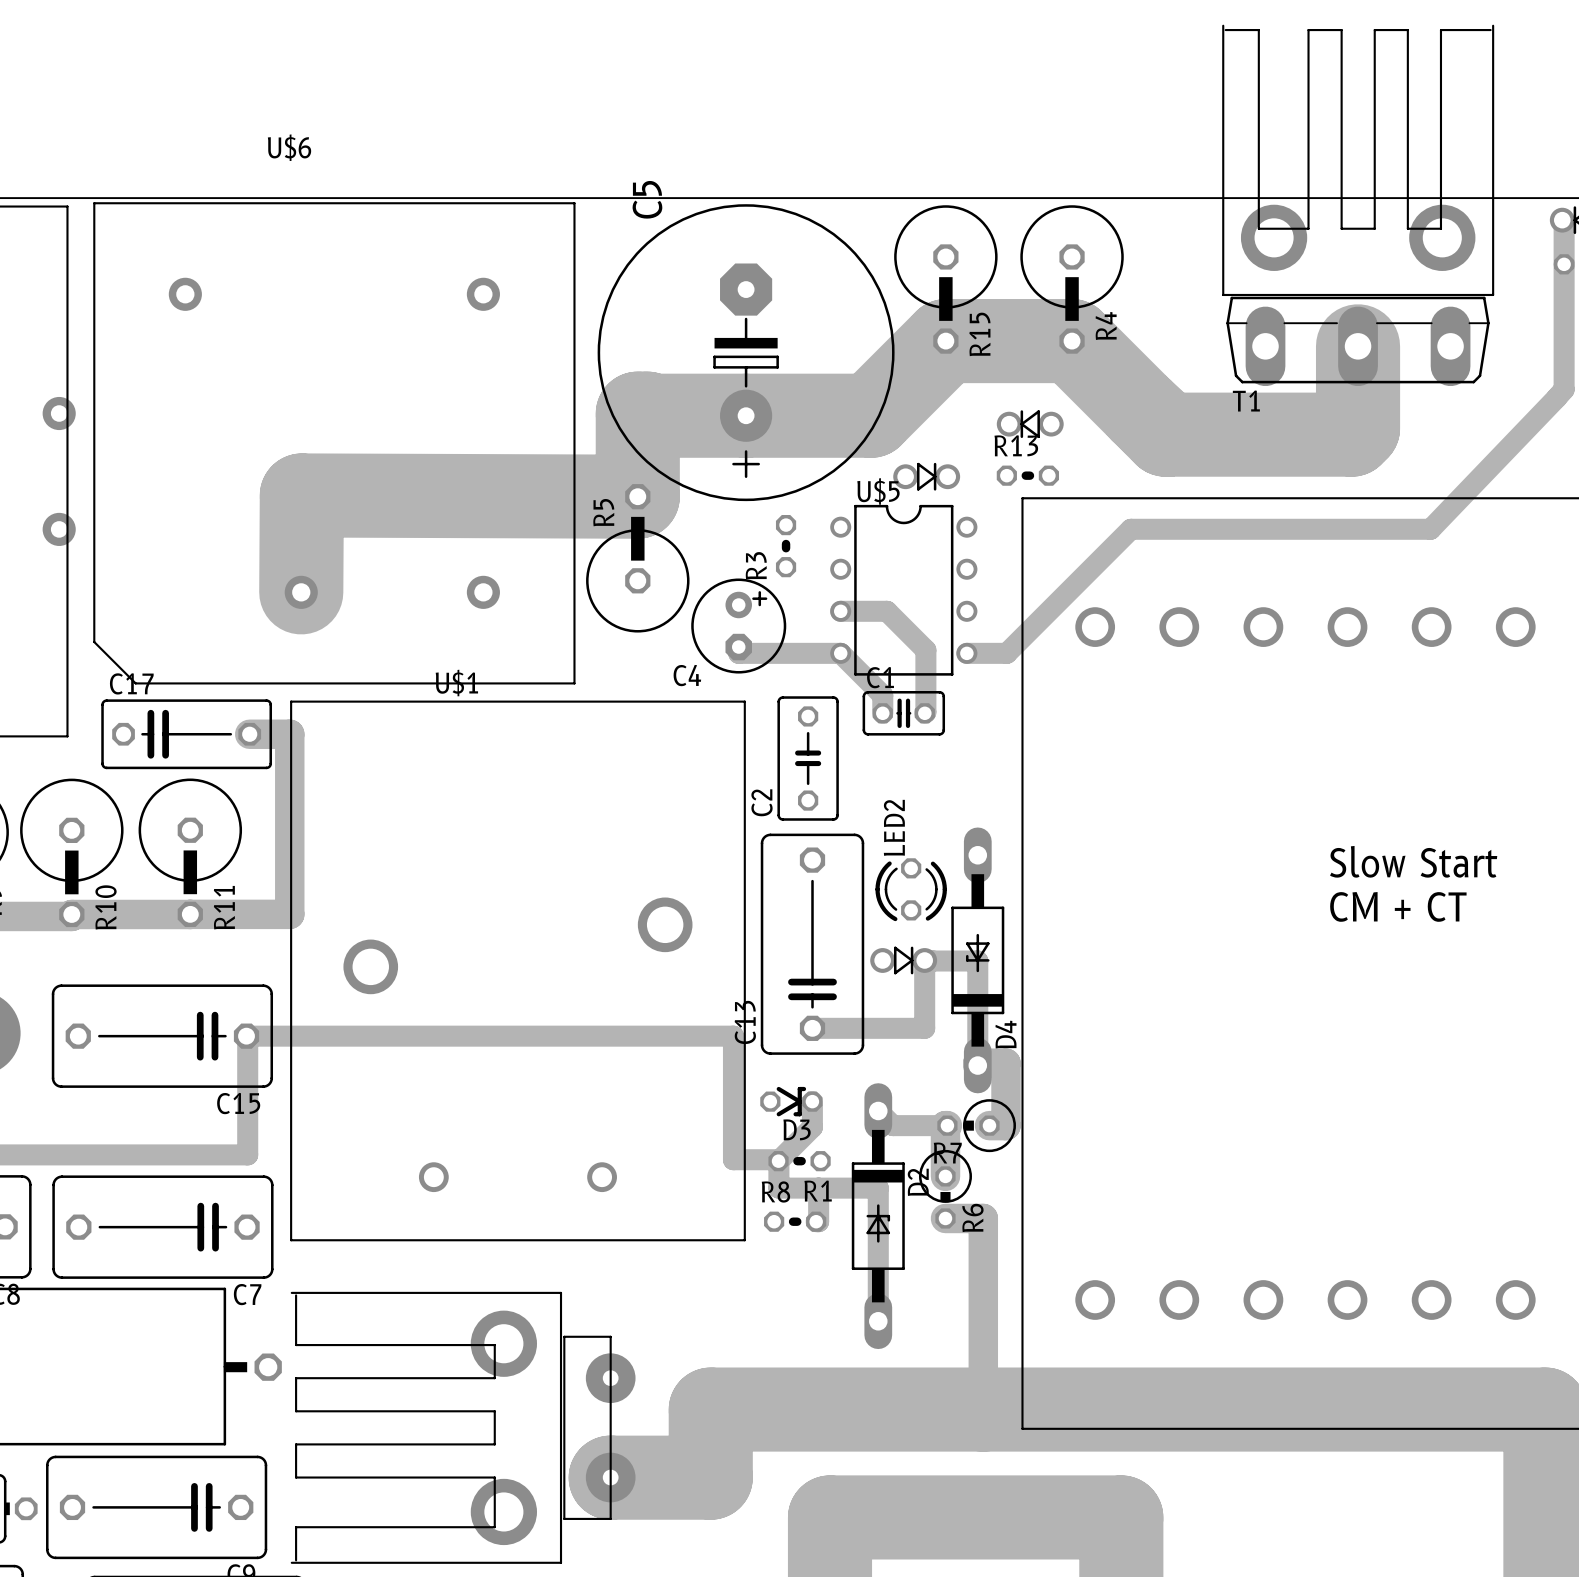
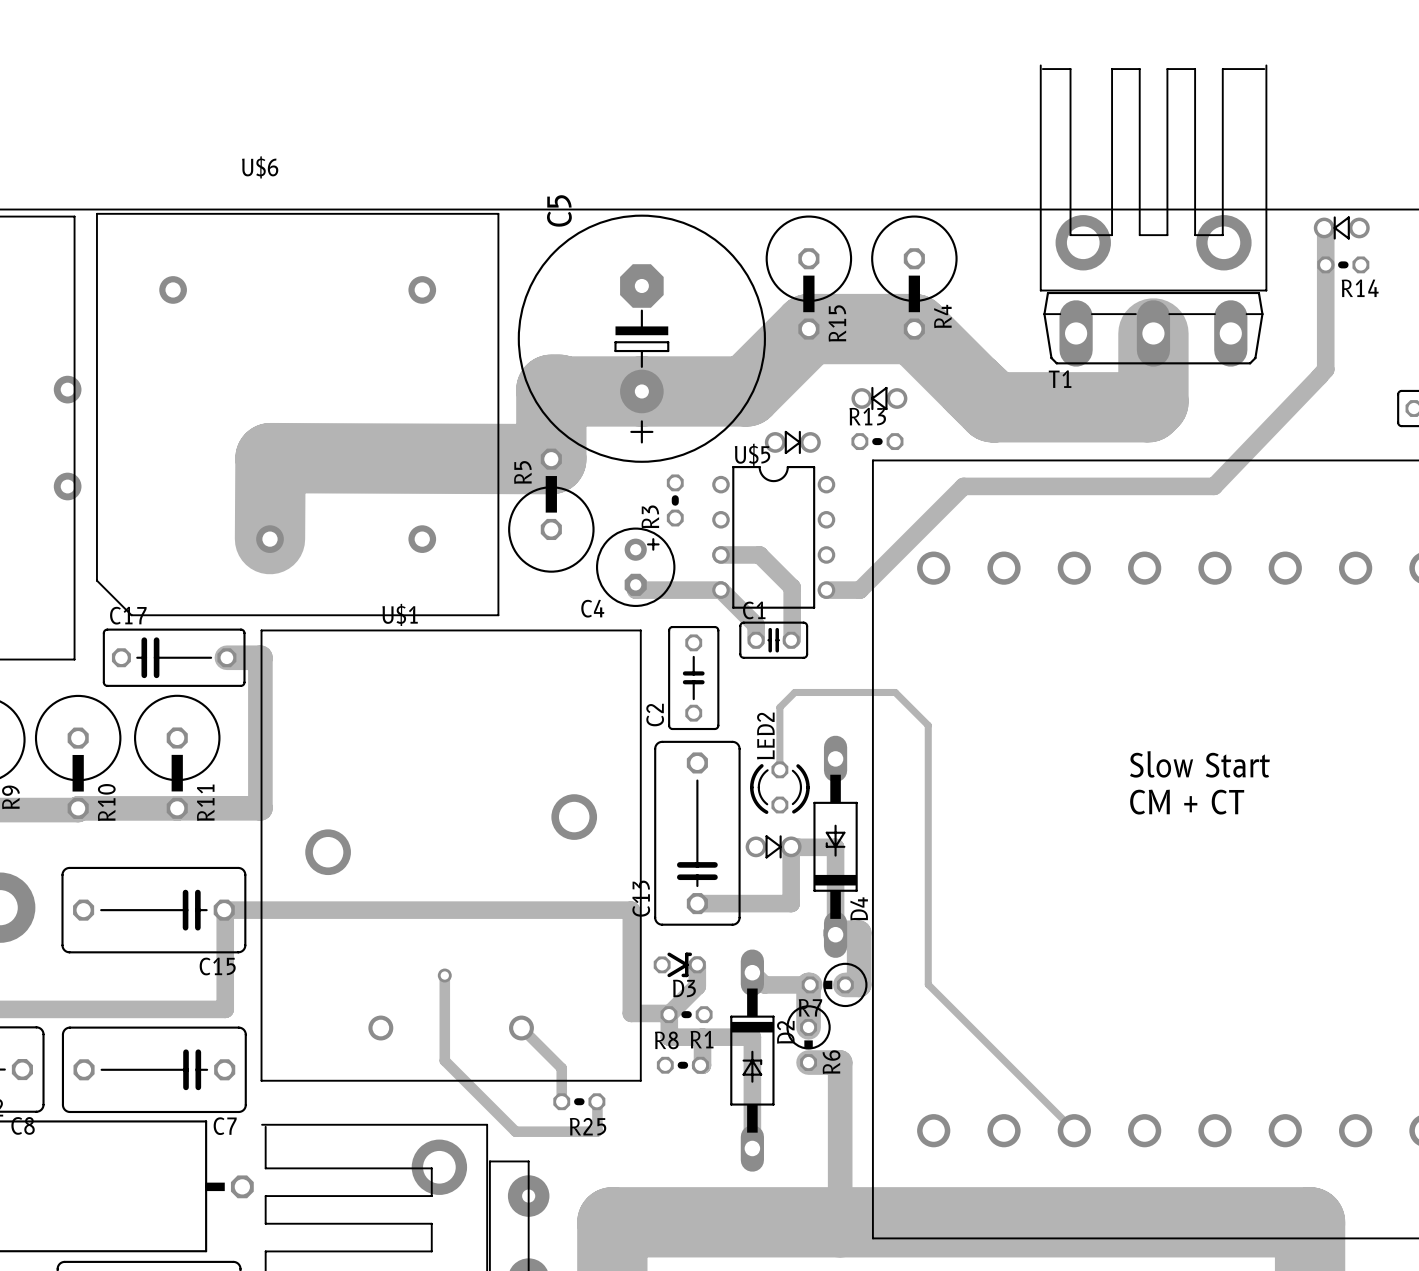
track: none -> (779, 769) (779, 707) (794, 692) (895, 692) (928, 725) (928, 984) (1074, 1130)
track: none -> (444, 975) (444, 1060) (515, 1131) (596, 1131) (596, 1101)
via: none -> (444, 975)
track: none -> (521, 1028) (561, 1068) (561, 1101)
R25: none -> (579, 1101)

